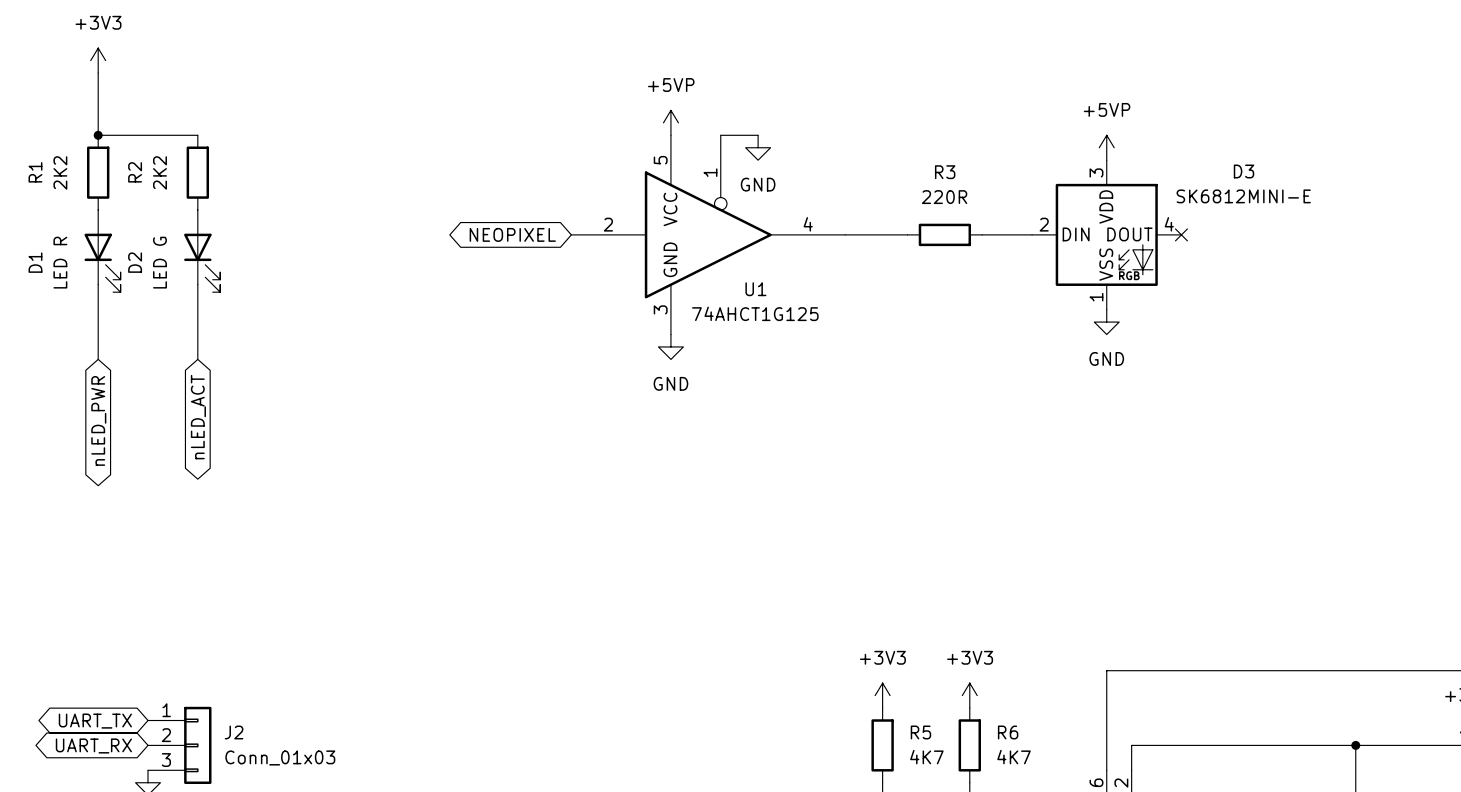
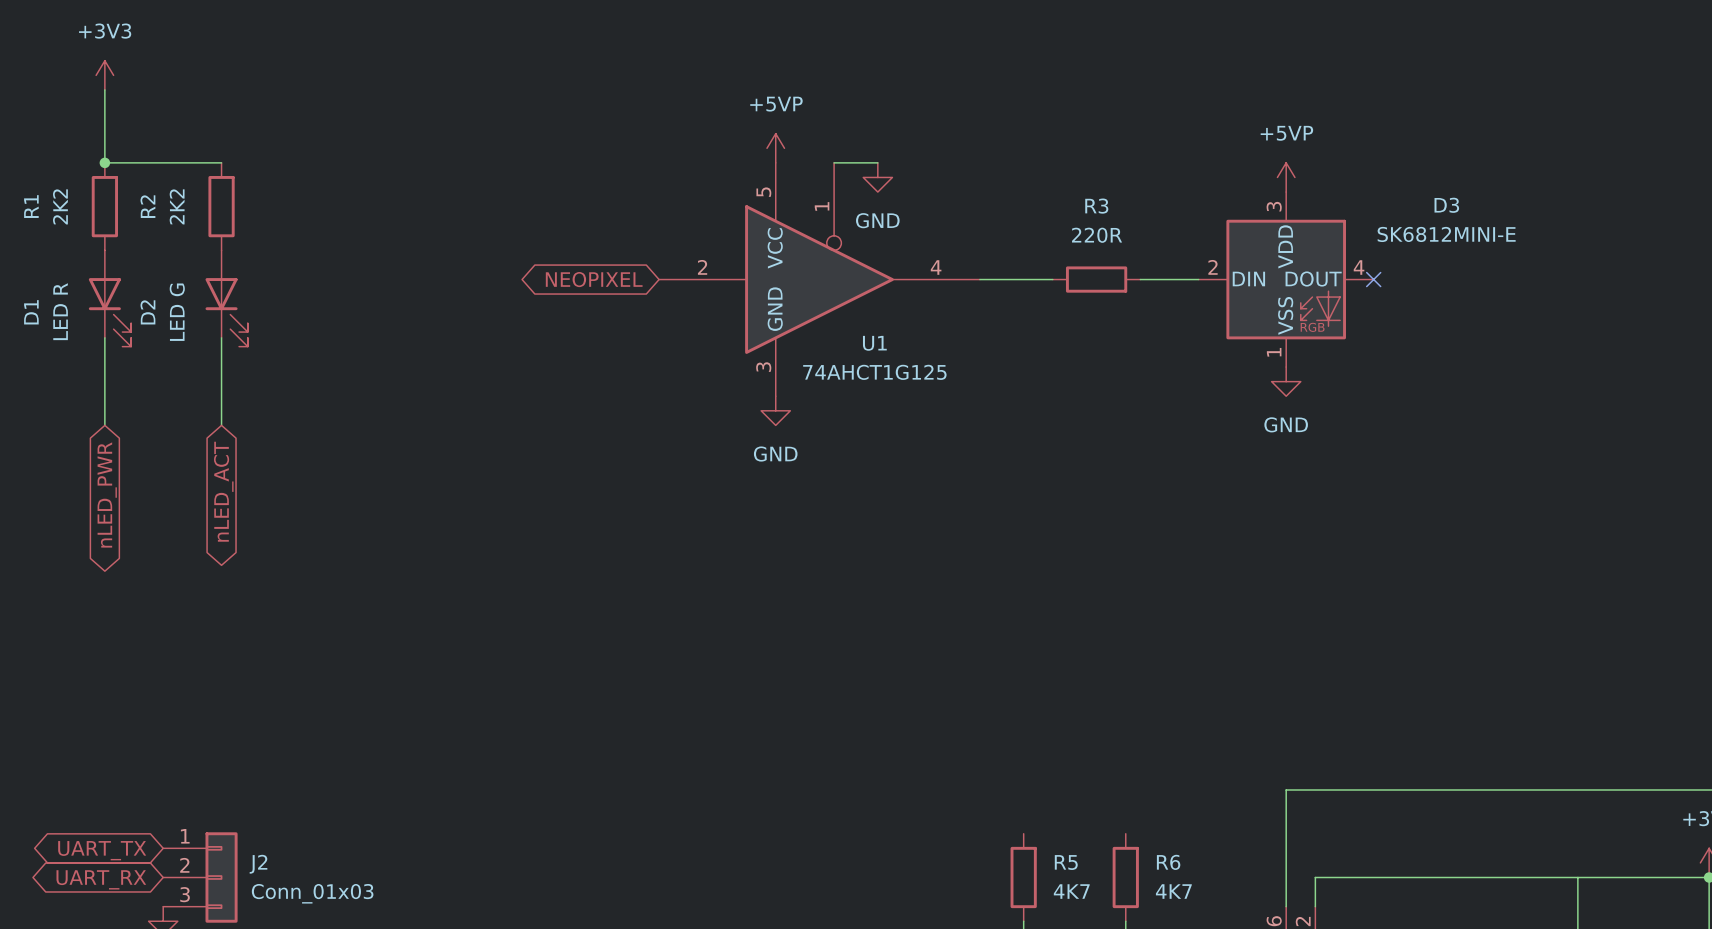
power symbol: +3V3 (882, 695) -> none
power symbol: +3V3 (969, 695) -> none
junction: (1355, 745) -> none

